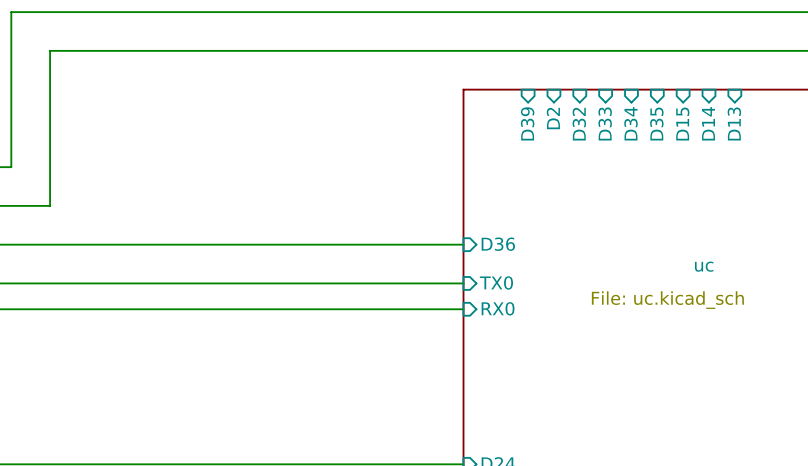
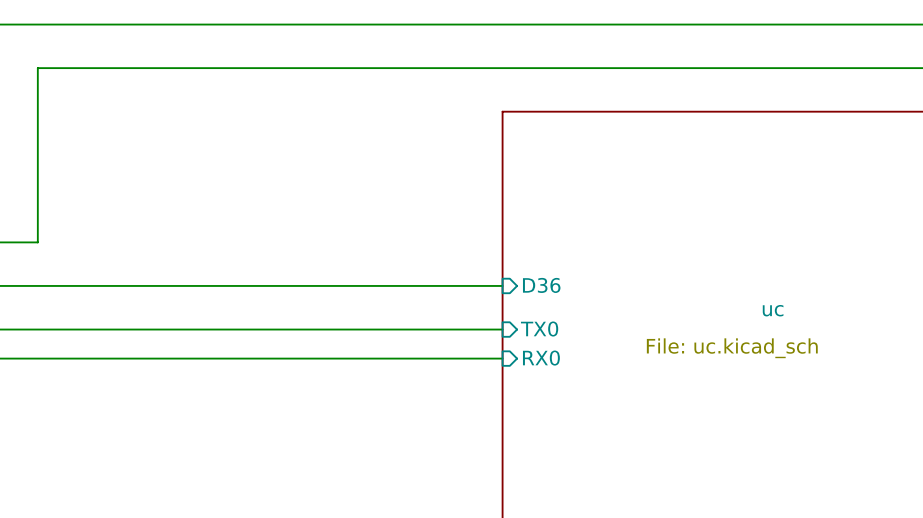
sheet pin: D2 (553, 118) -> none
sheet pin: D39 (527, 123) -> none
sheet pin: D33 (605, 123) -> none
sheet pin: D34 (630, 123) -> none
sheet pin: D14 (708, 123) -> none
sheet pin: D13 (734, 123) -> none
sheet pin: D32 (579, 124) -> none
sheet pin: D35 (656, 124) -> none
sheet pin: D15 (682, 124) -> none

